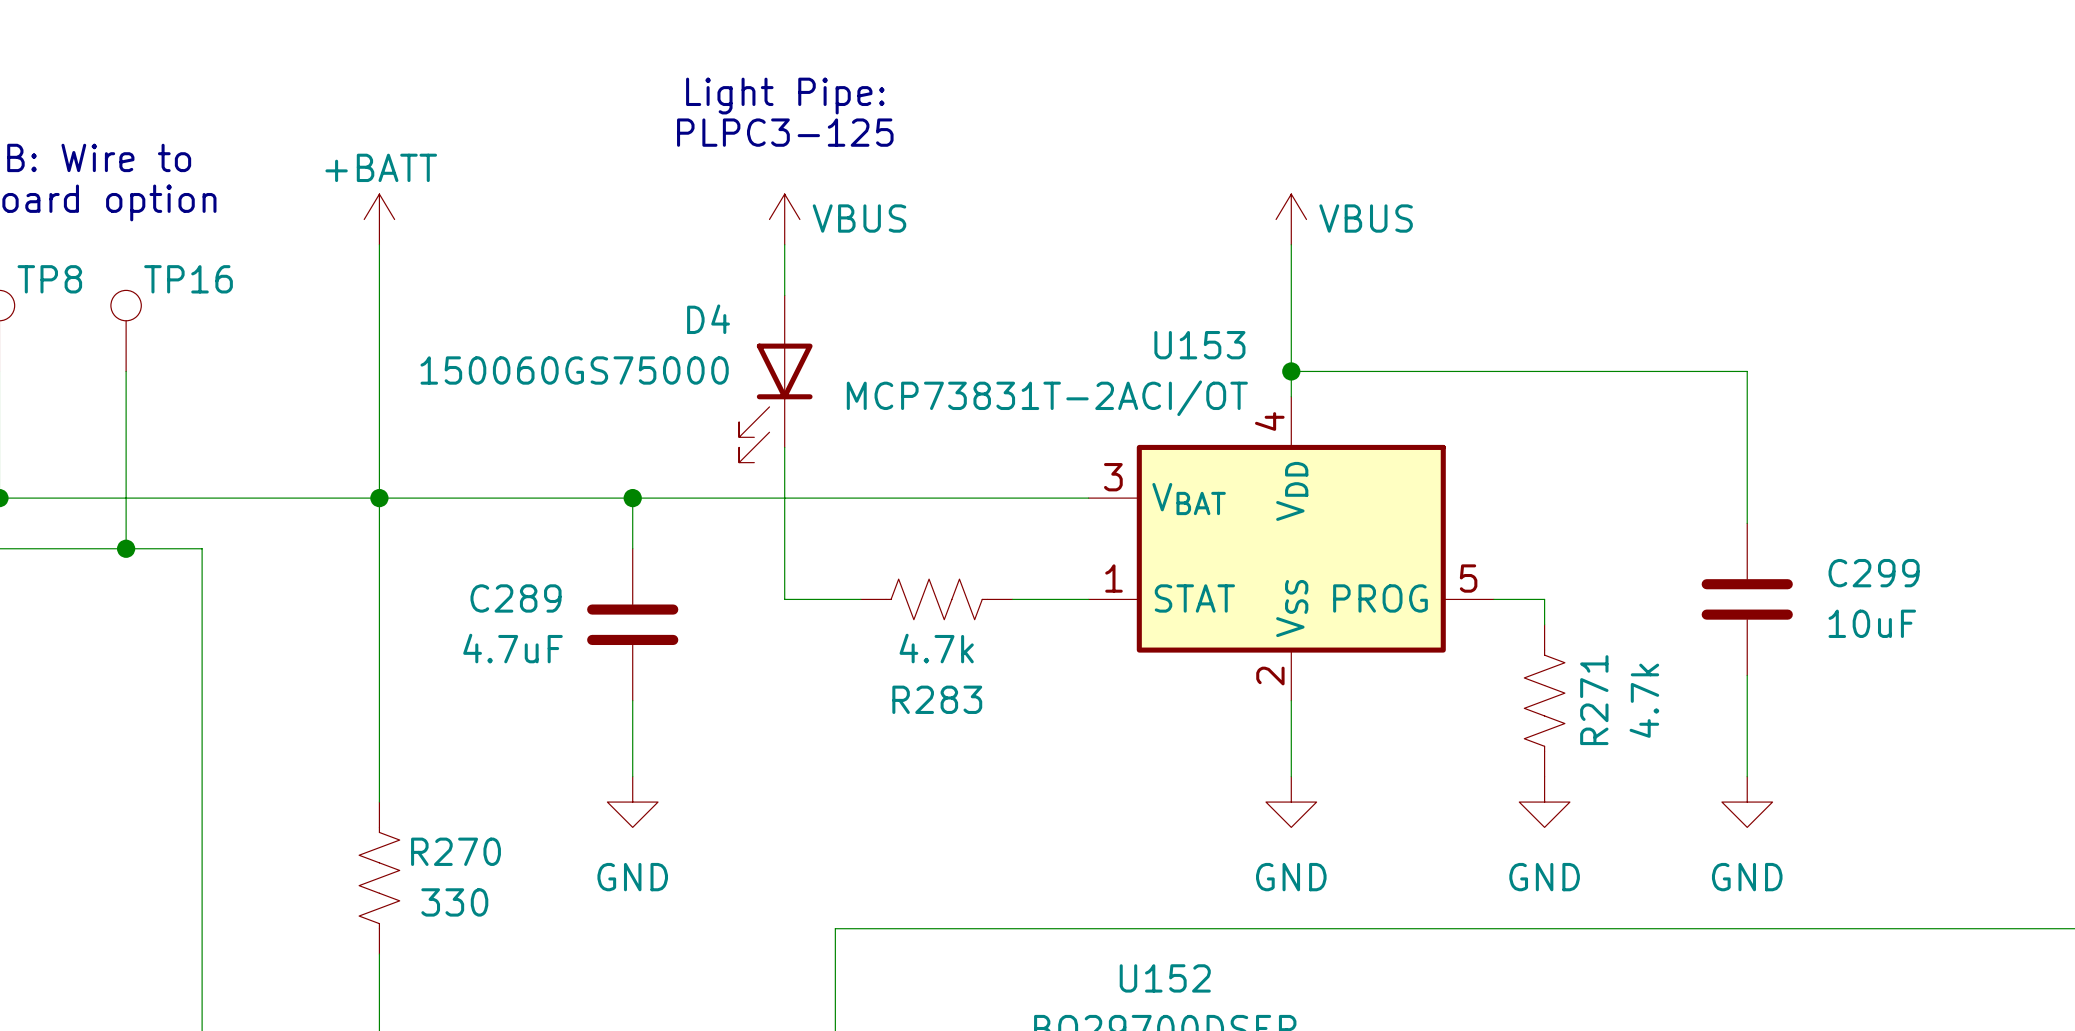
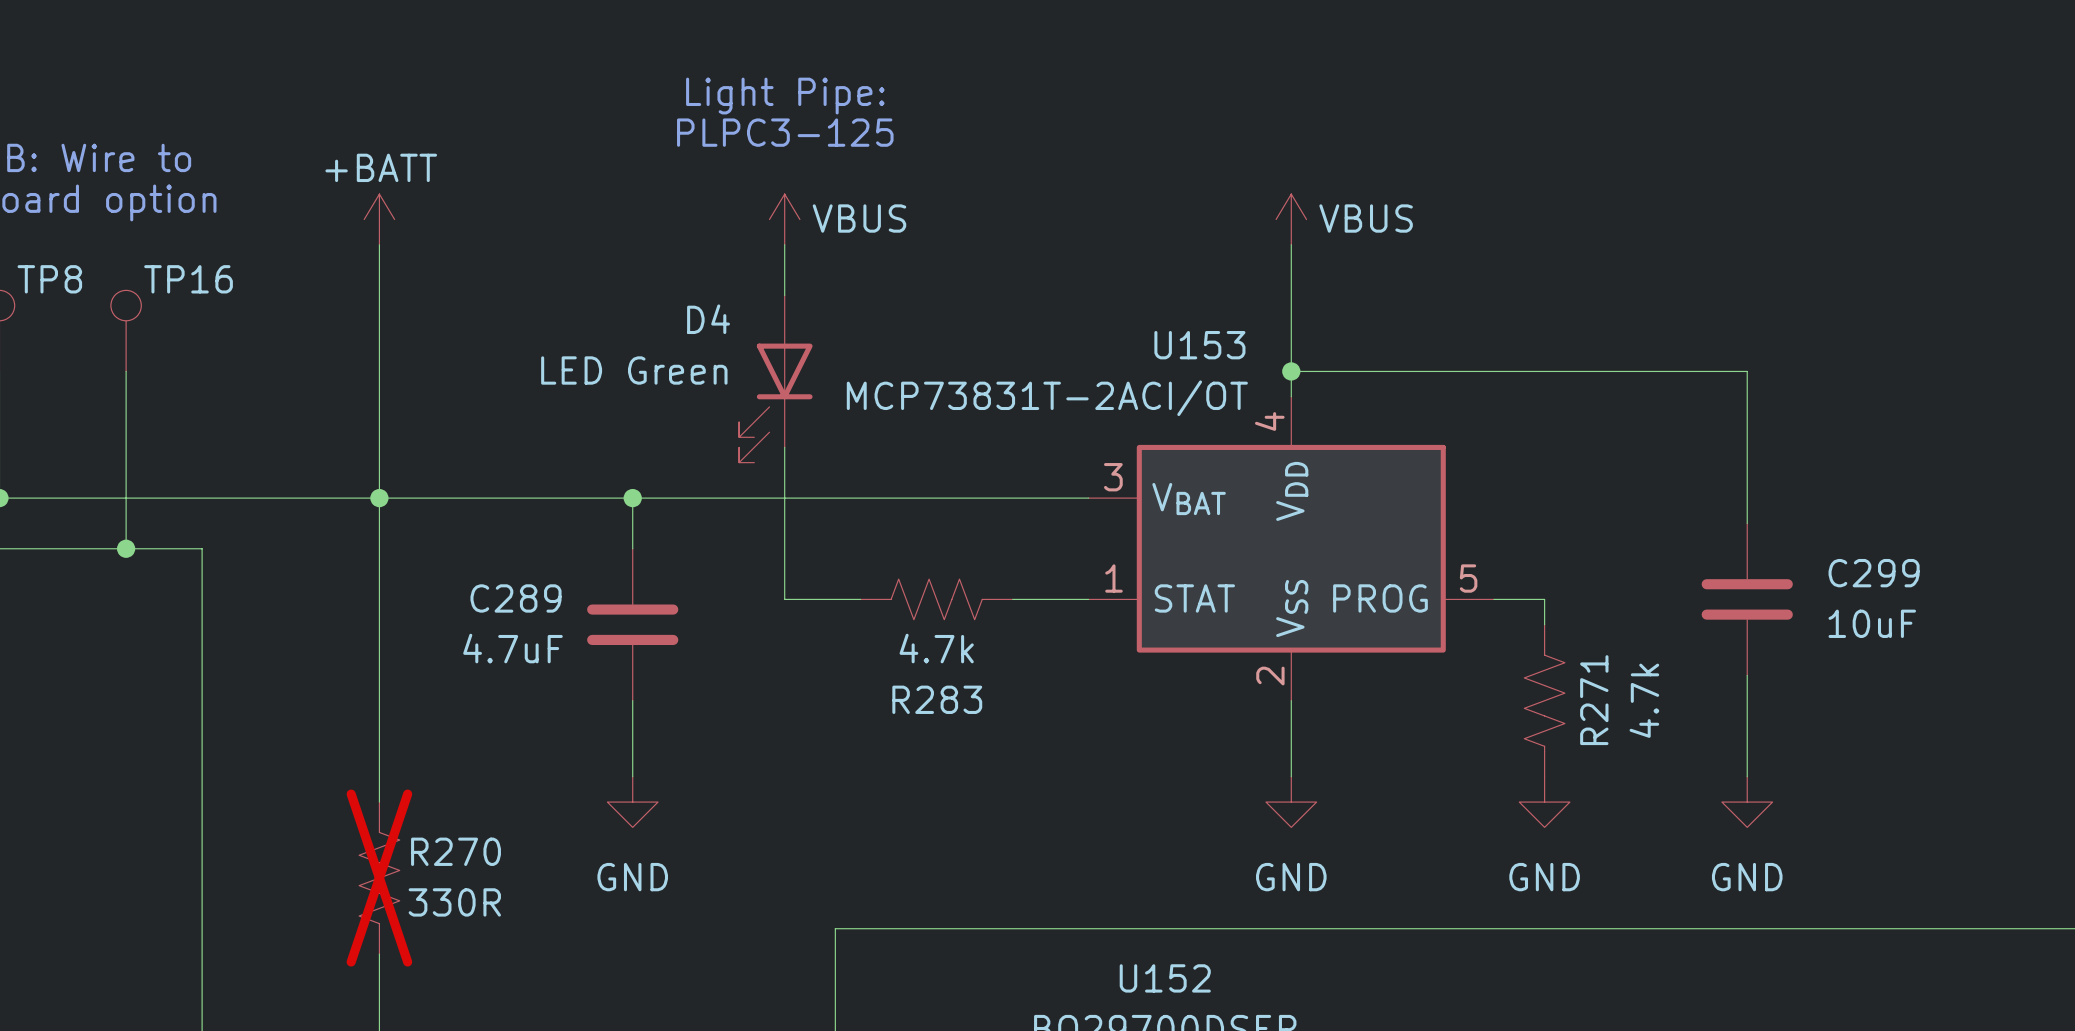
D4 value: 150060GS75000 (574, 370) -> LED Green (634, 370)
R270 do-not-place cross: none -> (379, 878)
R270 value: 330 (454, 902) -> 330R (454, 902)

